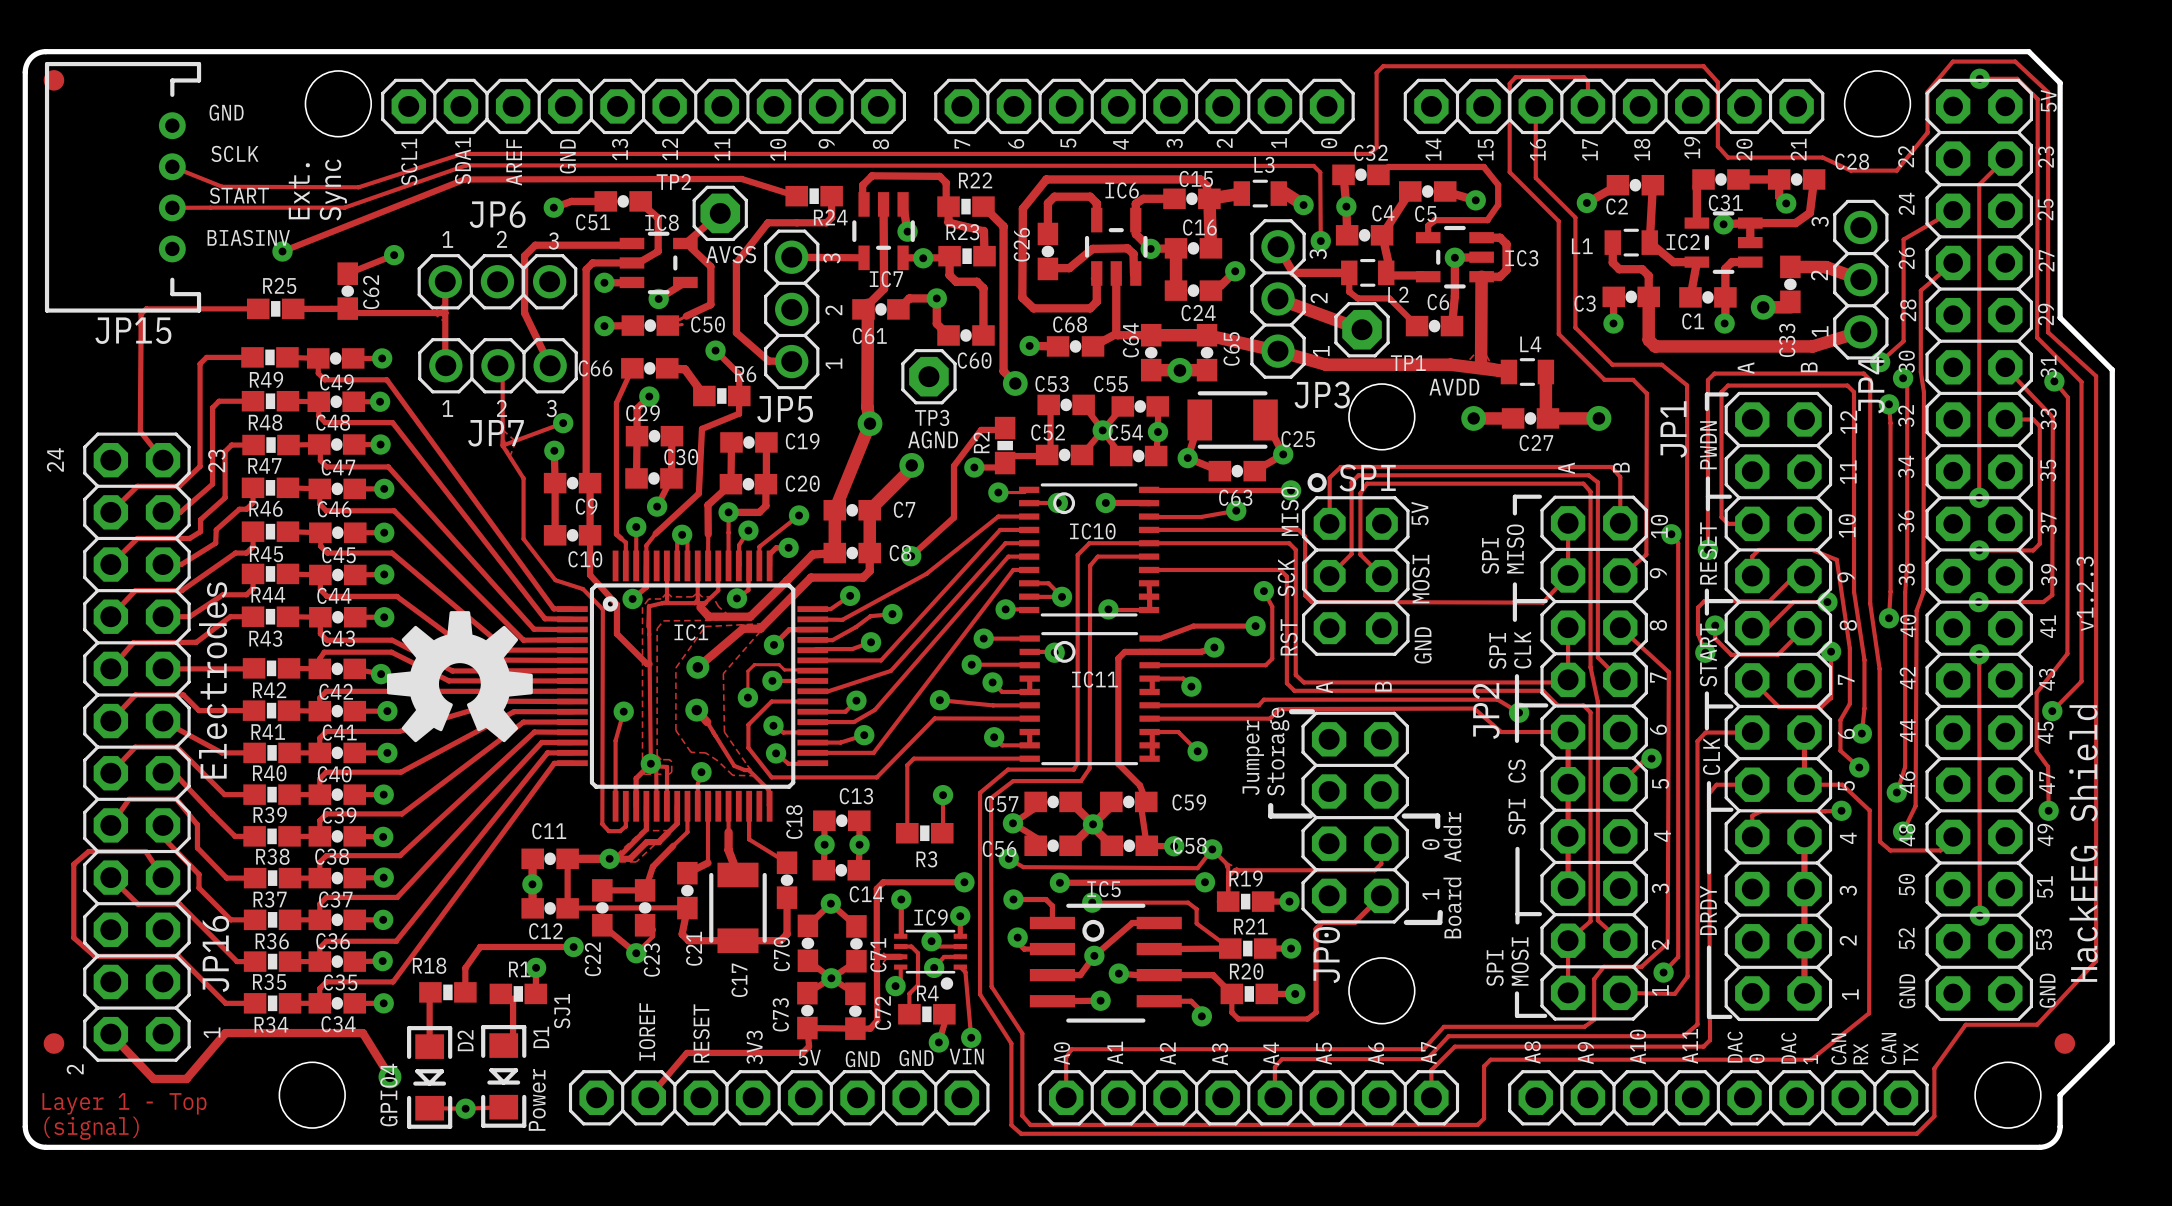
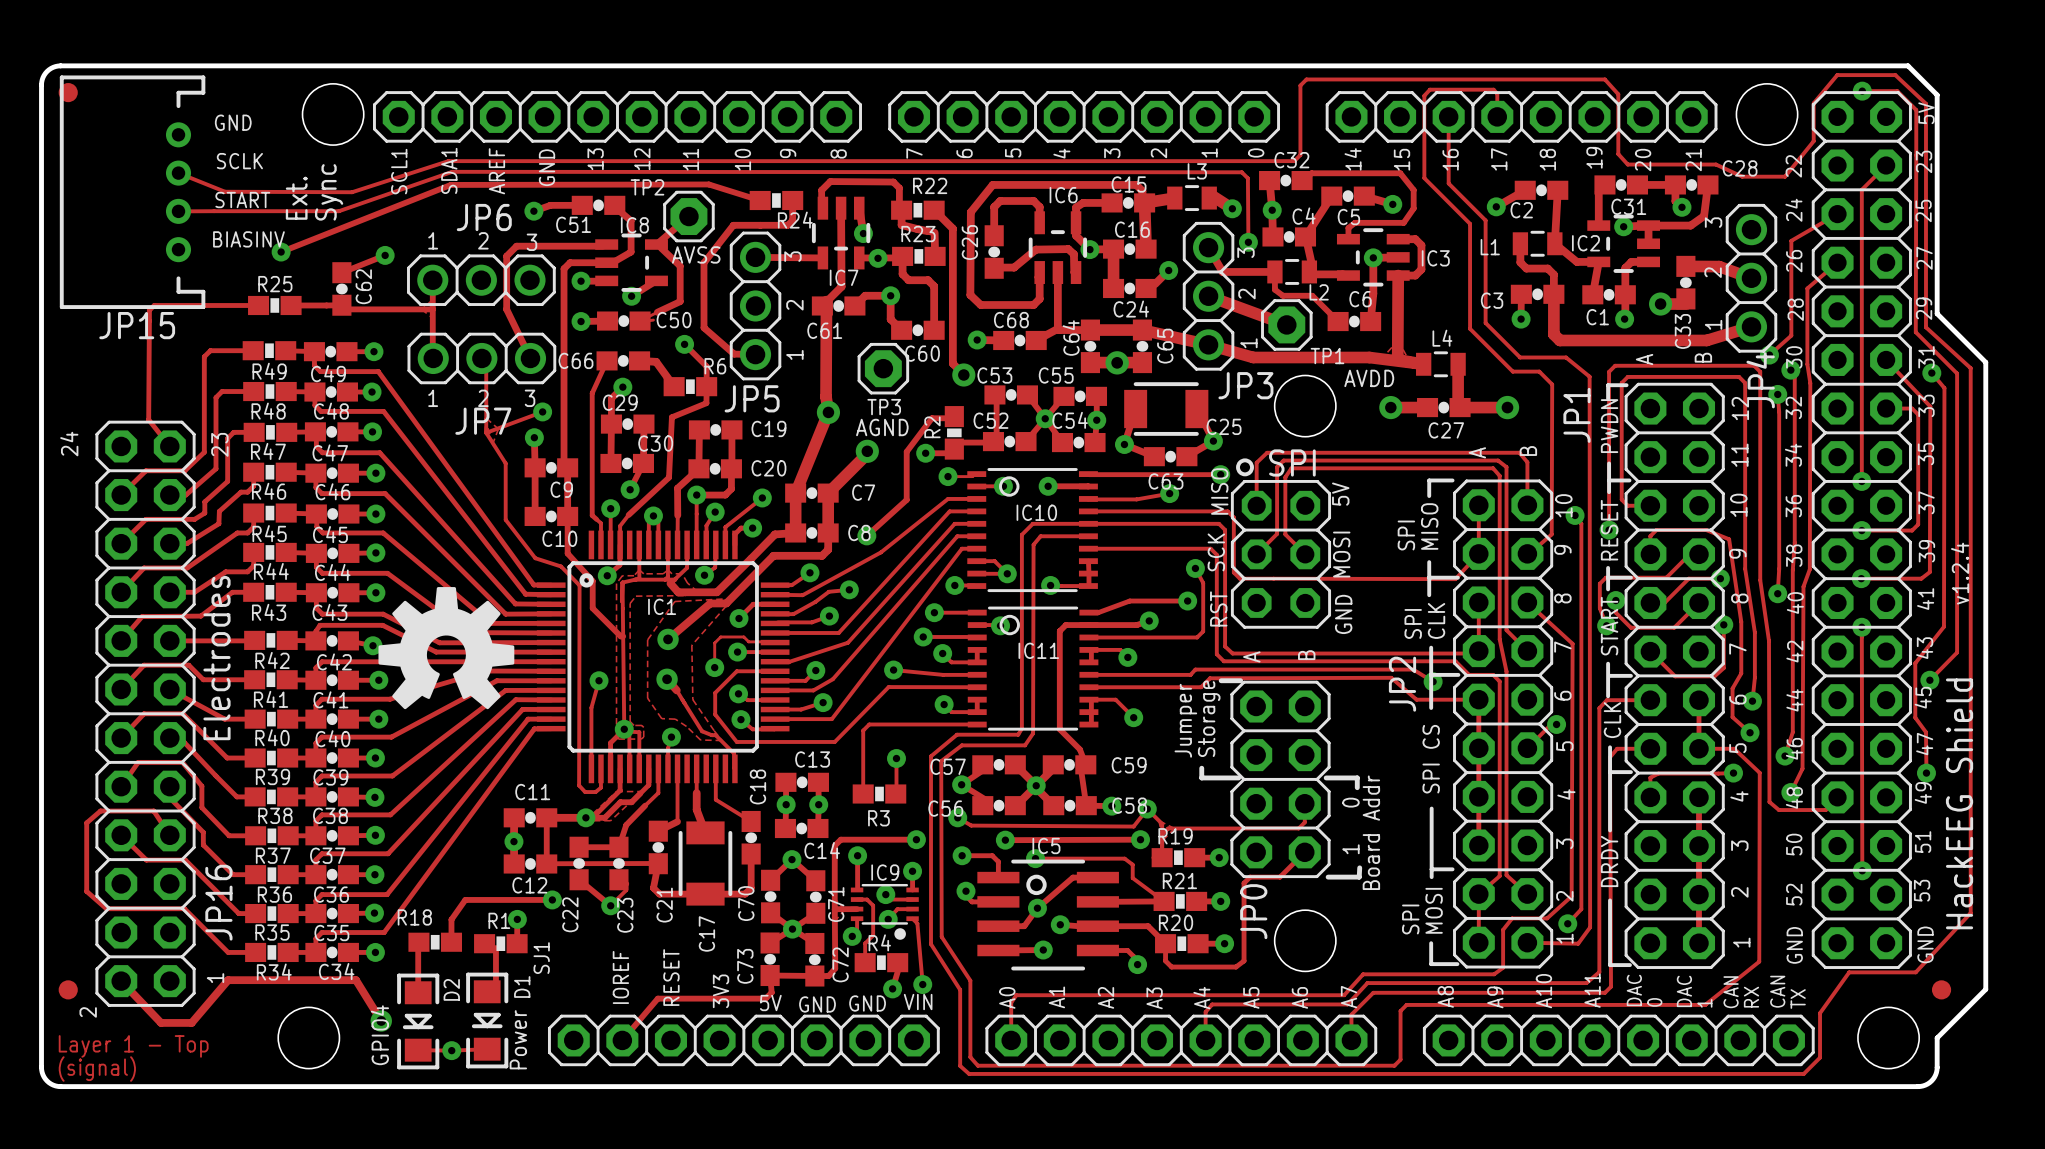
text: v1.2.3 (2085, 593) -> v1.2.4 (1960, 573)

